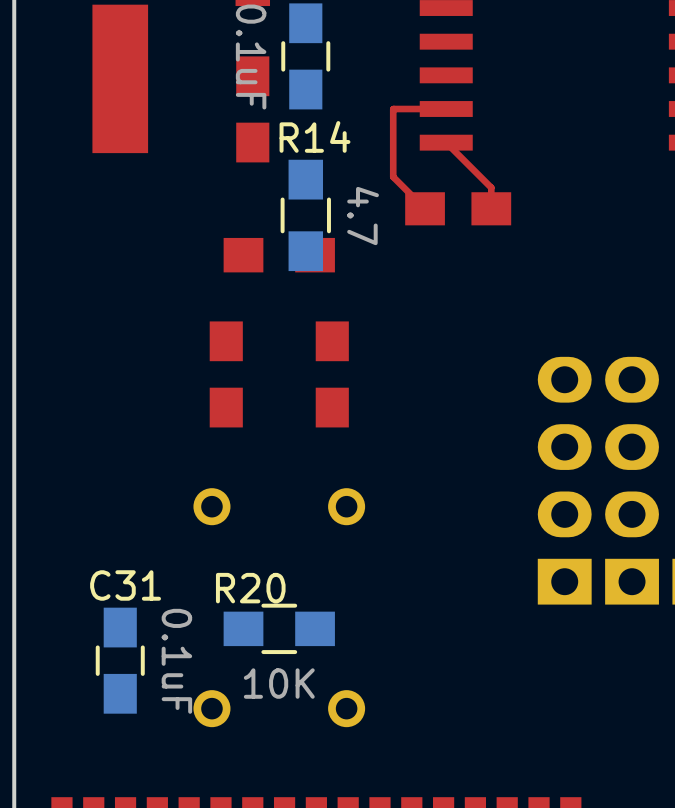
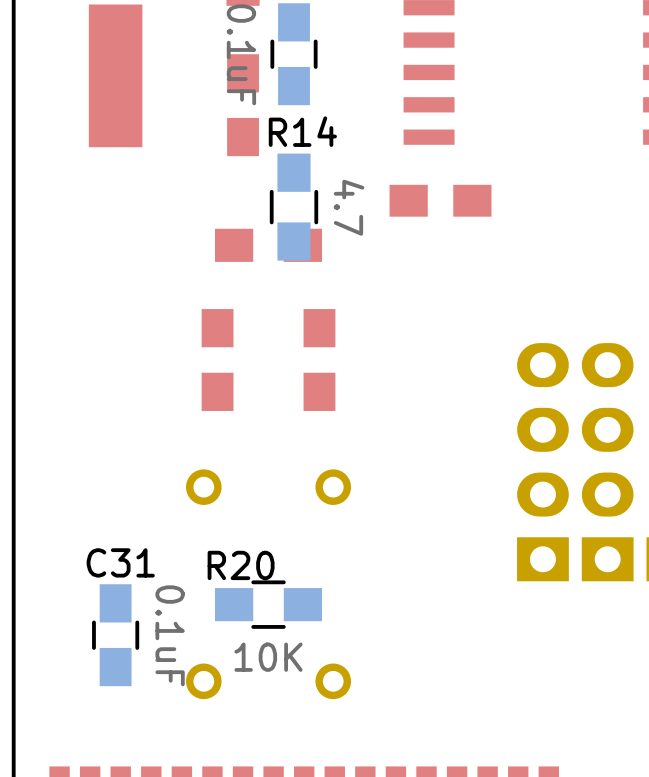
top track: (446, 109) (393, 109) (393, 176) (425, 208) -> none
top track: (446, 142) (491, 187) (491, 208) -> none

